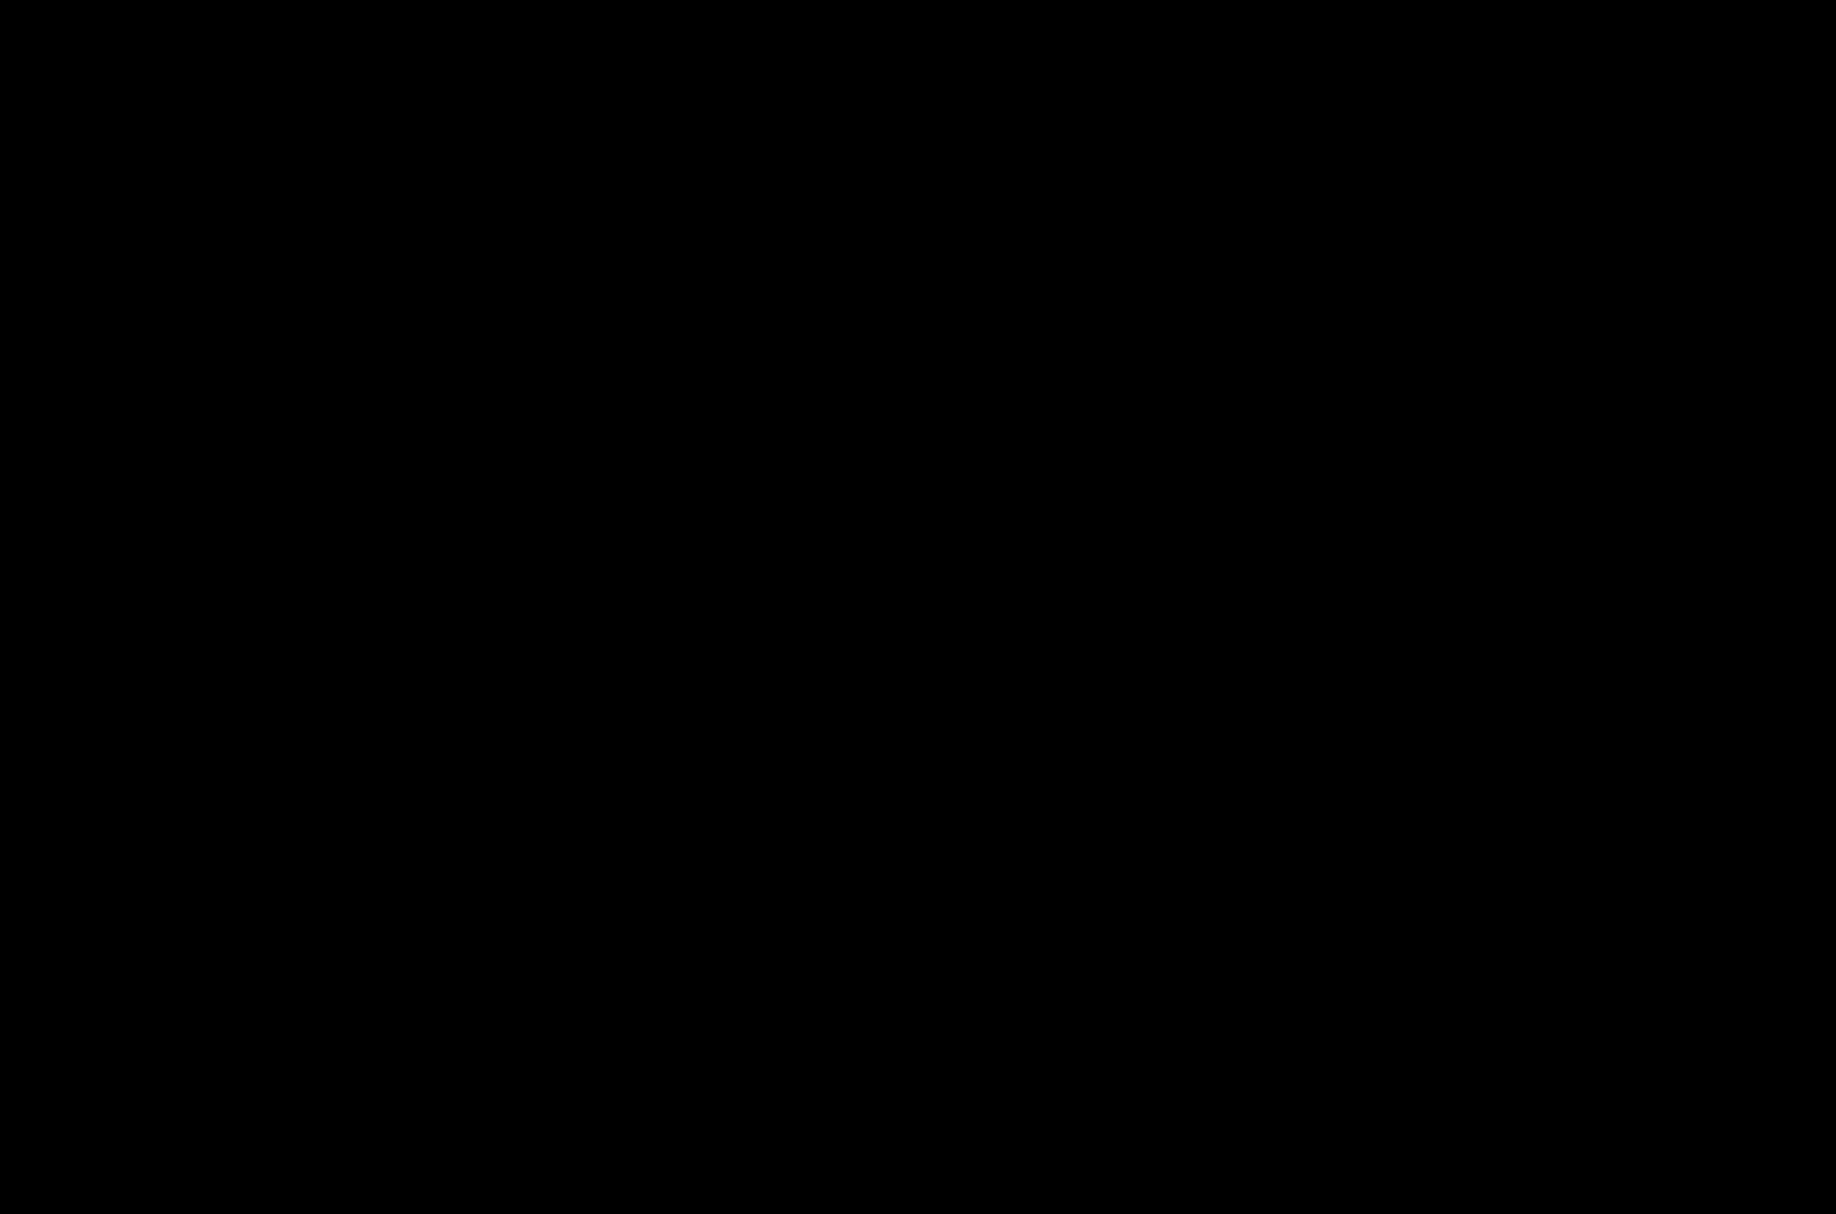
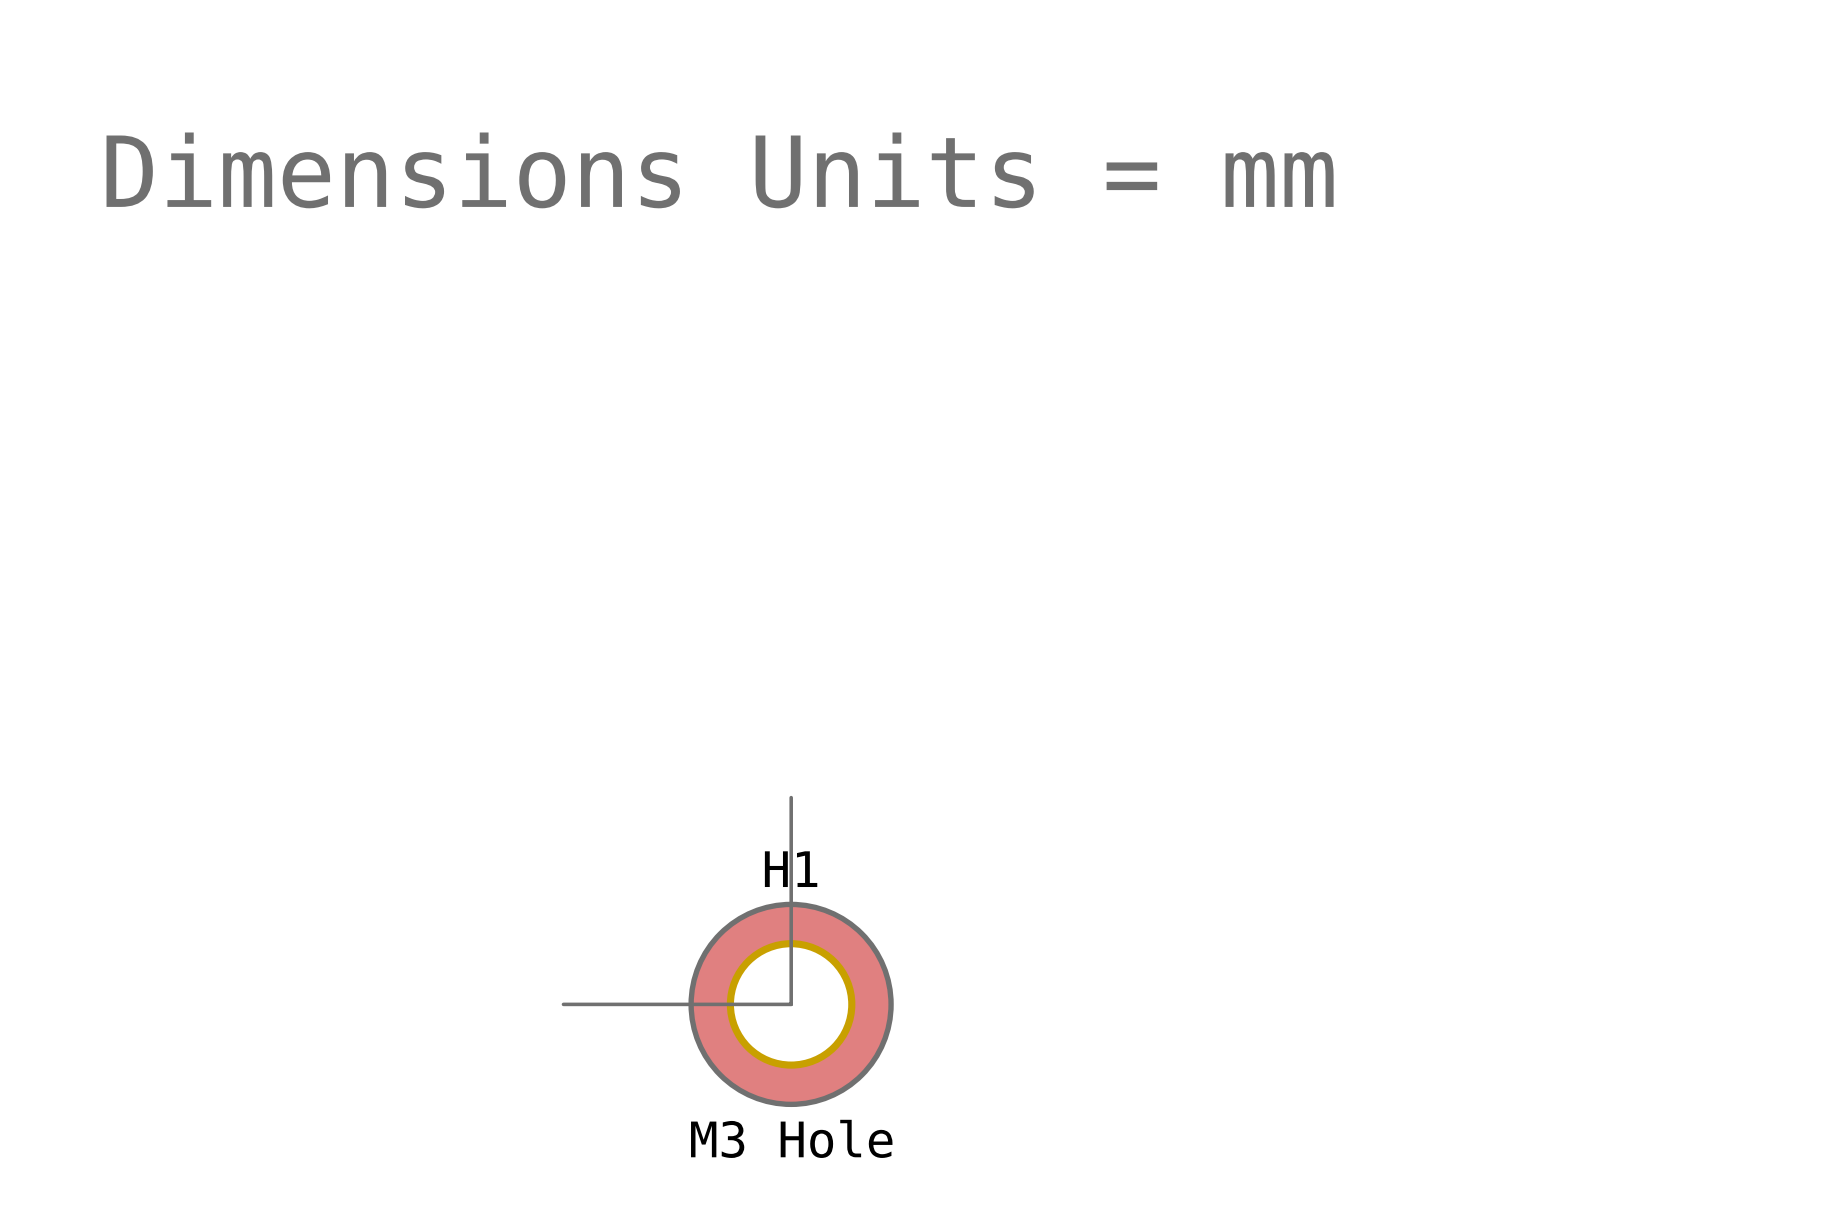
text: none -> Dimensions Units = mm (720, 170)
line: none -> (791, 797) (791, 1004) (563, 1004)
H1: none -> (791, 1004)
text: none -> M3 Hole (791, 1138)

